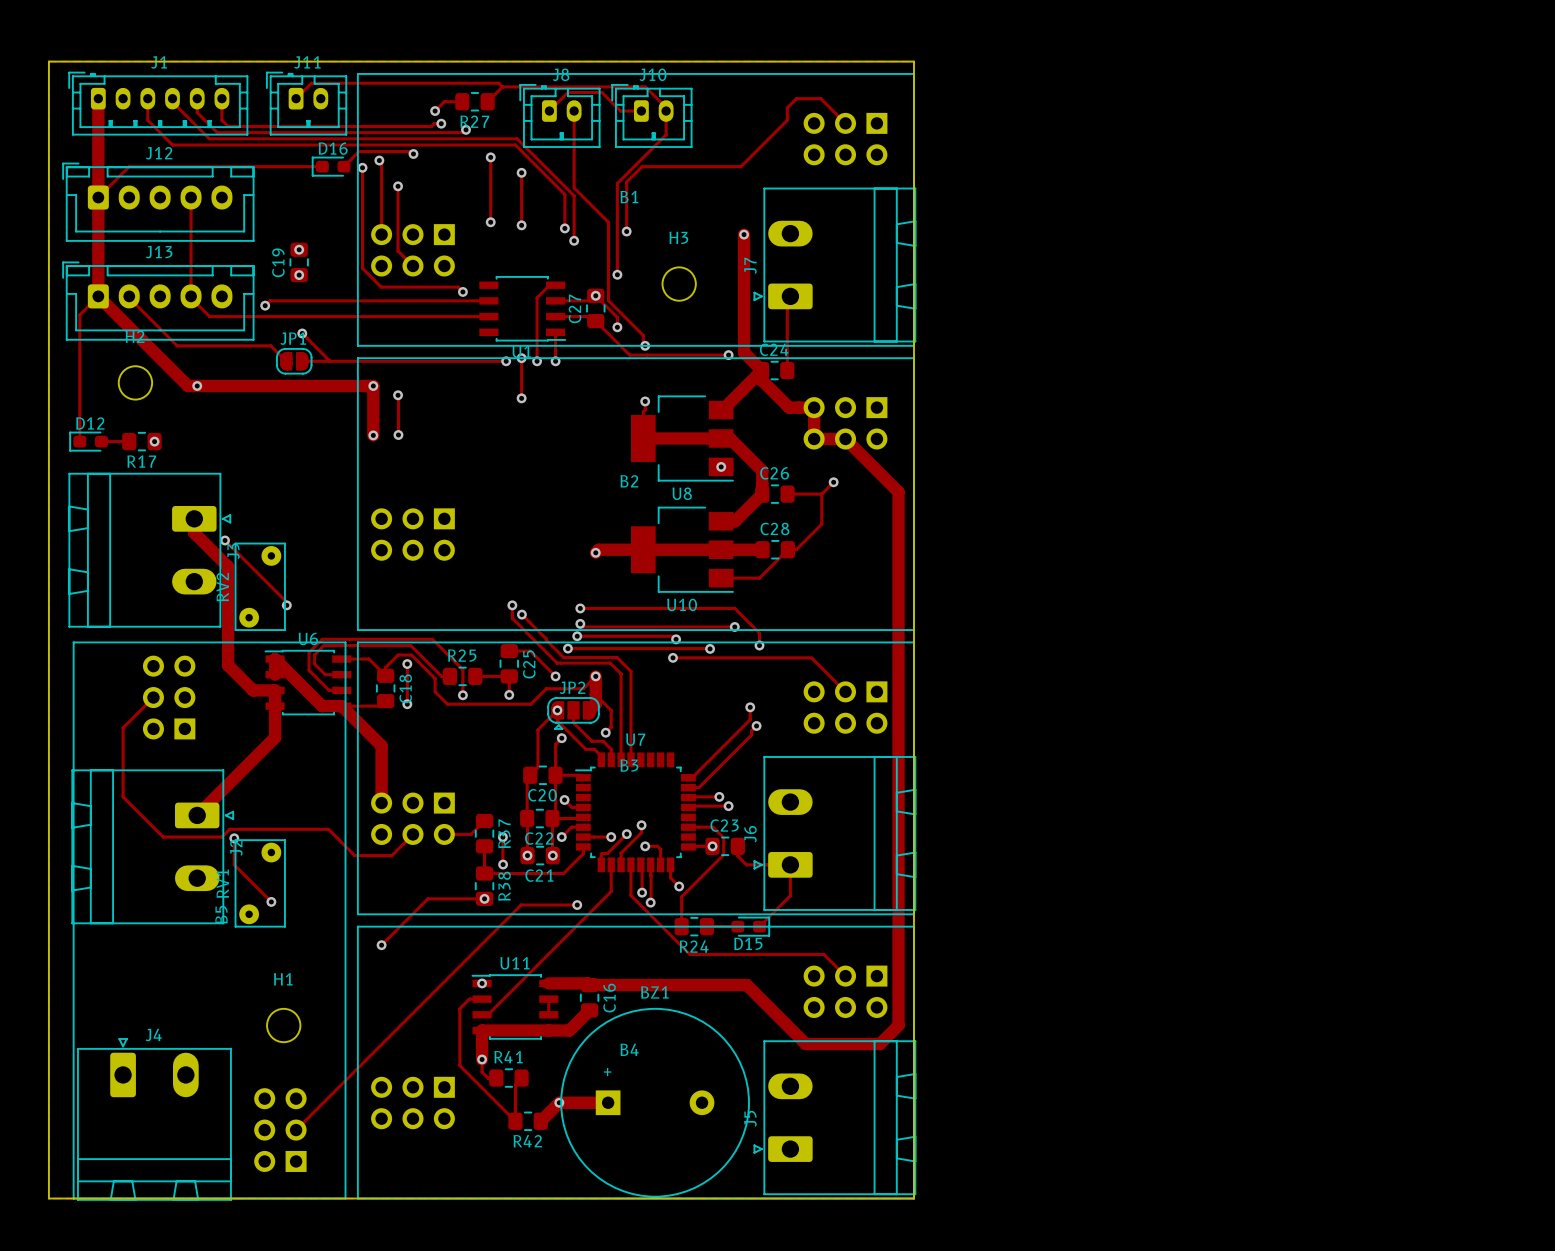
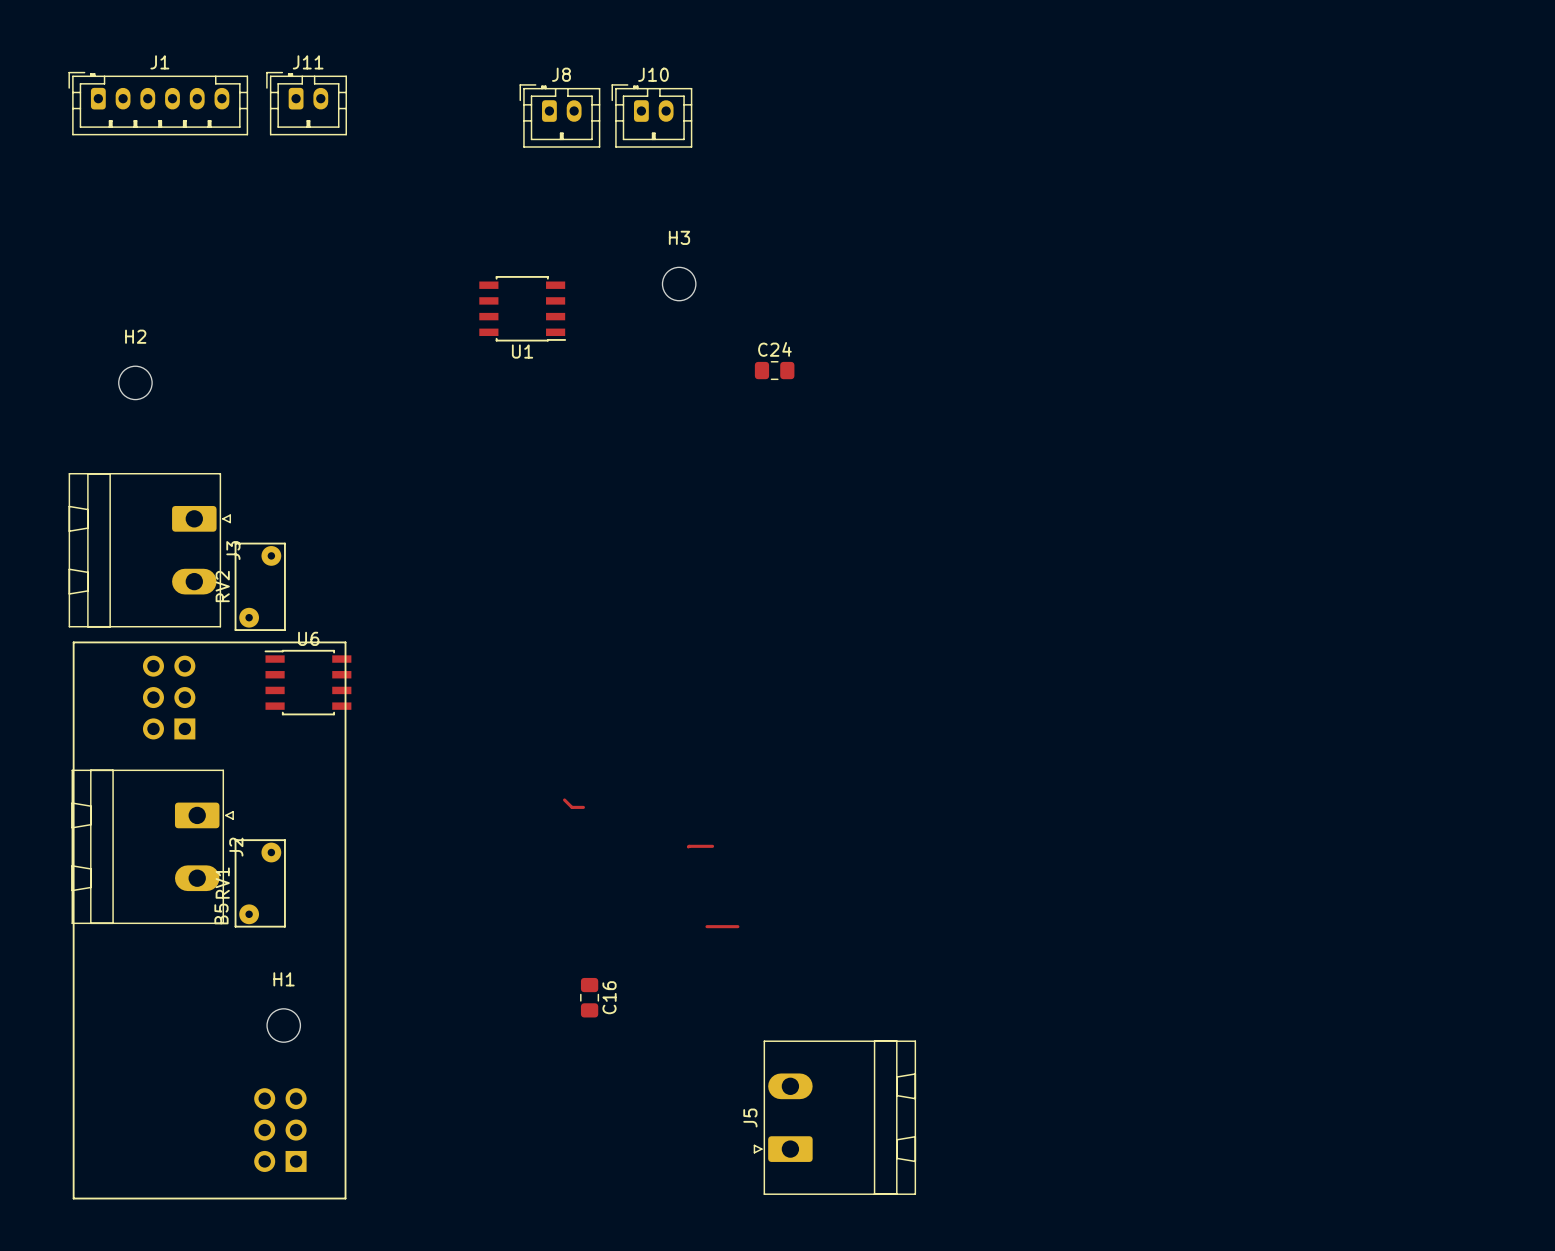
board edge: (48, 61) (48, 1198) (913, 1198) (913, 61) (48, 61) -> none
track: (502, 86) (487, 101) -> none
track: (502, 86) (645, 86) (666, 107) (666, 134) (617, 183) (617, 274) -> none
track: (502, 86) (498, 83) (311, 83) (296, 98) -> none
track: (98, 98) (98, 296) -> none
track: (147, 98) (147, 120) (172, 145) (515, 145) (564, 194) (564, 228) -> none
track: (172, 98) (172, 102) (209, 138) (517, 138) (574, 195) (574, 240) -> none
track: (197, 98) (197, 112) (217, 132) (463, 132) (466, 129) -> none
track: (221, 98) (221, 120) (228, 126) (431, 126) (434, 123) (441, 123) -> none
track: (462, 101) (444, 101) (435, 111) -> none
R27: (474, 101) -> none
via: (435, 111) -> none
track: (549, 111) (567, 92) (601, 92) (620, 111) (641, 111) -> none
track: (574, 111) (574, 187) (608, 222) (608, 300) (643, 335) (645, 345) -> none
via: (441, 123) -> none
track: (845, 123) (820, 98) (796, 98) (787, 107) (787, 120) (740, 166) (642, 166) (626, 182) (626, 231) -> none
via: (466, 129) -> none
track: (413, 153) (411, 151) (359, 151) (343, 166) -> none
via: (413, 153) -> none
track: (490, 157) (490, 222) -> none
via: (490, 157) -> none
track: (379, 160) (381, 162) (381, 234) -> none
via: (379, 160) -> none
track: (322, 166) (129, 166) (98, 197) -> none
D16: (331, 166) -> none
track: (362, 167) (362, 268) (381, 287) (458, 287) (462, 291) -> none
via: (362, 167) -> none
track: (521, 172) (521, 225) -> none
via: (521, 172) -> none
track: (398, 186) (398, 251) (412, 265) -> none
via: (398, 186) -> none
track: (191, 197) (191, 297) (209, 316) (488, 316) -> none
J12: (158, 202) -> none
B1: (635, 209) -> none
via: (490, 222) -> none
via: (521, 225) -> none
via: (564, 228) -> none
via: (626, 231) -> none
track: (744, 234) (744, 352) (761, 370) -> none
via: (744, 234) -> none
via: (574, 240) -> none
via: (299, 249) -> none
C19: (299, 262) -> none
J7: (834, 265) -> none
via: (617, 274) -> none
via: (299, 275) -> none
track: (555, 285) (549, 285) (537, 297) (537, 361) -> none
via: (462, 291) -> none
via: (595, 295) -> none
track: (98, 296) (187, 385) (373, 385) (373, 435) -> none
track: (98, 296) (79, 314) (79, 441) -> none
track: (129, 296) (177, 345) (270, 345) (286, 361) -> none
track: (790, 296) (787, 299) (787, 370) -> none
track: (488, 300) (269, 300) (265, 305) -> none
track: (555, 300) (590, 300) (595, 295) (617, 317) (617, 327) -> none
J13: (158, 301) -> none
via: (265, 305) -> none
C27: (595, 308) -> none
track: (555, 316) (591, 316) (629, 355) (728, 355) -> none
via: (617, 327) -> none
track: (555, 332) (555, 361) -> none
track: (302, 333) (330, 361) -> none
via: (302, 333) -> none
via: (645, 345) -> none
via: (728, 355) -> none
track: (521, 358) (521, 398) -> none
via: (521, 358) -> none
JP1: (294, 361) -> none
track: (302, 361) (506, 361) -> none
via: (506, 361) -> none
via: (537, 361) -> none
via: (555, 361) -> none
track: (761, 370) (761, 380) (789, 407) (814, 407) (814, 439) (845, 439) (898, 492) (898, 1025) (880, 1044) (805, 1044) (746, 985) (548, 983) -> none
track: (761, 370) (721, 410) -> none
via: (197, 385) -> none
via: (373, 385) -> none
track: (398, 395) (398, 434) -> none
via: (398, 395) -> none
via: (521, 398) -> none
track: (645, 401) (643, 438) (729, 438) (762, 470) (762, 494) (735, 521) (721, 521) -> none
via: (645, 401) -> none
via: (398, 434) -> none
via: (373, 435) -> none
U8: (682, 438) -> none
D12: (88, 441) -> none
track: (101, 441) (129, 441) -> none
R17: (141, 441) -> none
via: (154, 441) -> none
via: (721, 466) -> none
track: (833, 482) (821, 494) -> none
via: (833, 482) -> none
B2: (635, 494) -> none
C26: (774, 494) -> none
track: (787, 494) (821, 494) -> none
track: (821, 494) (821, 524) (796, 549) (787, 549) (759, 578) (721, 578) -> none
track: (194, 518) (194, 532) (228, 566) (228, 665) (253, 690) (275, 690) (275, 737) (197, 815) -> none
track: (225, 540) (286, 602) (286, 605) -> none
via: (225, 540) -> none
U10: (682, 549) -> none
track: (762, 549) (598, 549) (595, 552) -> none
C28: (775, 549) -> none
via: (595, 552) -> none
via: (286, 605) -> none
track: (512, 605) (512, 618) (557, 663) (610, 663) (621, 673) (621, 759) -> none
via: (512, 605) -> none
track: (580, 608) (734, 608) (759, 633) (759, 645) -> none
via: (580, 608) -> none
track: (521, 614) (563, 657) (617, 657) (630, 671) (630, 759) -> none
via: (521, 614) -> none
track: (580, 623) (583, 626) (734, 626) -> none
via: (580, 623) -> none
via: (734, 626) -> none
track: (577, 636) (673, 636) (676, 639) -> none
via: (577, 636) -> none
via: (676, 639) -> none
via: (759, 645) -> none
track: (567, 648) (710, 648) -> none
via: (567, 648) -> none
via: (710, 648) -> none
track: (509, 651) (530, 651) (555, 676) -> none
track: (673, 657) (812, 657) -> none
via: (673, 657) -> none
track: (812, 658) (845, 691) -> none
track: (341, 659) (368, 659) (385, 675) (385, 667) (398, 655) (411, 655) (435, 678) (435, 691) (447, 704) (530, 704) (546, 688) (583, 688) (595, 676) (595, 704) (589, 710) -> none
C25: (509, 663) -> none
track: (407, 664) (407, 704) -> none
via: (407, 664) -> none
track: (275, 674) (275, 659) (322, 706) (341, 706) -> none
track: (341, 674) (325, 674) (314, 664) (314, 654) (323, 645) (410, 645) (441, 676) (449, 676) -> none
R25: (462, 676) -> none
track: (475, 676) (509, 676) (509, 694) -> none
via: (555, 676) -> none
via: (595, 676) -> none
C18: (385, 688) -> none
track: (341, 690) (329, 690) (309, 670) (309, 652) (322, 639) (432, 639) (462, 669) (462, 695) -> none
via: (509, 694) -> none
track: (595, 694) (611, 710) (611, 727) (605, 732) -> none
via: (462, 695) -> none
track: (153, 697) (123, 727) (123, 796) (163, 837) (221, 837) (229, 829) (328, 829) (354, 855) (391, 855) (412, 834) -> none
track: (385, 701) (380, 706) (341, 706) -> none
via: (407, 704) -> none
track: (341, 706) (381, 745) (381, 803) -> none
track: (750, 707) (750, 719) (692, 777) (688, 777) -> none
via: (750, 707) -> none
via: (557, 710) -> none
track: (573, 710) (573, 722) (592, 741) (603, 741) (611, 749) (611, 759) -> none
JP2: (573, 713) -> none
track: (756, 725) (751, 730) (751, 734) (698, 787) (688, 787) -> none
via: (756, 725) -> none
via: (605, 732) -> none
track: (561, 738) (555, 744) (555, 815) (552, 818) -> none
via: (561, 738) -> none
track: (601, 759) (601, 756) (594, 749) (585, 749) (557, 720) (557, 710) (537, 729) (537, 767) (527, 778) (527, 855) -> none
C20: (542, 775) -> none
track: (555, 775) (580, 775) (583, 777) -> none
B3: (635, 778) -> none
track: (719, 796) (688, 797) -> none
via: (719, 796) -> none
via: (564, 799) -> none
track: (728, 806) (688, 807) -> none
via: (728, 806) -> none
U7: (635, 812) -> none
track: (583, 817) (552, 818) -> none
C22: (539, 818) -> none
track: (552, 818) (552, 855) -> none
track: (484, 820) (471, 834) (444, 834) -> none
track: (641, 825) (641, 832) (621, 853) (621, 864) -> none
via: (641, 825) -> none
track: (583, 827) (571, 827) (561, 837) -> none
track: (688, 827) (713, 827) (723, 837) (723, 854) (681, 896) (681, 926) -> none
R37: (484, 833) -> none
J6: (834, 833) -> none
track: (626, 834) (607, 853) (601, 854) (601, 864) -> none
via: (626, 834) -> none
track: (502, 837) (502, 864) -> none
via: (502, 837) -> none
via: (561, 837) -> none
track: (583, 837) (611, 837) -> none
via: (611, 837) -> none
track: (234, 838) (234, 864) (271, 901) -> none
via: (234, 838) -> none
track: (484, 846) (484, 873) (563, 873) (583, 853) (583, 846) -> none
track: (645, 846) (657, 846) (660, 849) (660, 864) -> none
via: (645, 846) -> none
via: (712, 846) -> none
C23: (725, 846) -> none
track: (737, 846) (737, 856) (746, 864) (790, 864) (790, 895) (759, 926) -> none
via: (527, 855) -> none
C21: (540, 855) -> none
via: (552, 855) -> none
via: (503, 864) -> none
track: (611, 864) (611, 891) (487, 1014) (482, 1014) -> none
track: (630, 864) (630, 895) (689, 954) (823, 954) (845, 976) -> none
track: (640, 864) (642, 892) -> none
track: (650, 864) (650, 902) -> none
track: (670, 864) (670, 877) (679, 886) -> none
R38: (484, 886) -> none
via: (679, 886) -> none
via: (642, 892) -> none
track: (484, 898) (427, 898) (381, 945) -> none
via: (484, 898) -> none
via: (271, 901) -> none
via: (650, 902) -> none
track: (577, 905) (521, 905) (296, 1130) -> none
via: (577, 905) -> none
R24: (694, 926) -> none
D15: (750, 926) -> none
via: (381, 945) -> none
via: (482, 983) -> none
track: (482, 999) (469, 999) (459, 1008) (459, 1065) (515, 1121) (515, 1084) (521, 1078) -> none
track: (548, 999) (548, 1014) -> none
U11: (514, 1006) -> none
track: (589, 1010) (569, 1030) (482, 1030) (482, 1072) (487, 1078) (496, 1078) -> none
via: (482, 1059) -> none
B4: (635, 1062) -> none
R41: (508, 1078) -> none
via: (559, 1102) -> none
track: (608, 1102) (559, 1102) (540, 1121) -> none
BZ1: (655, 1102) -> none
J4: (154, 1119) -> none
R42: (528, 1121) -> none

